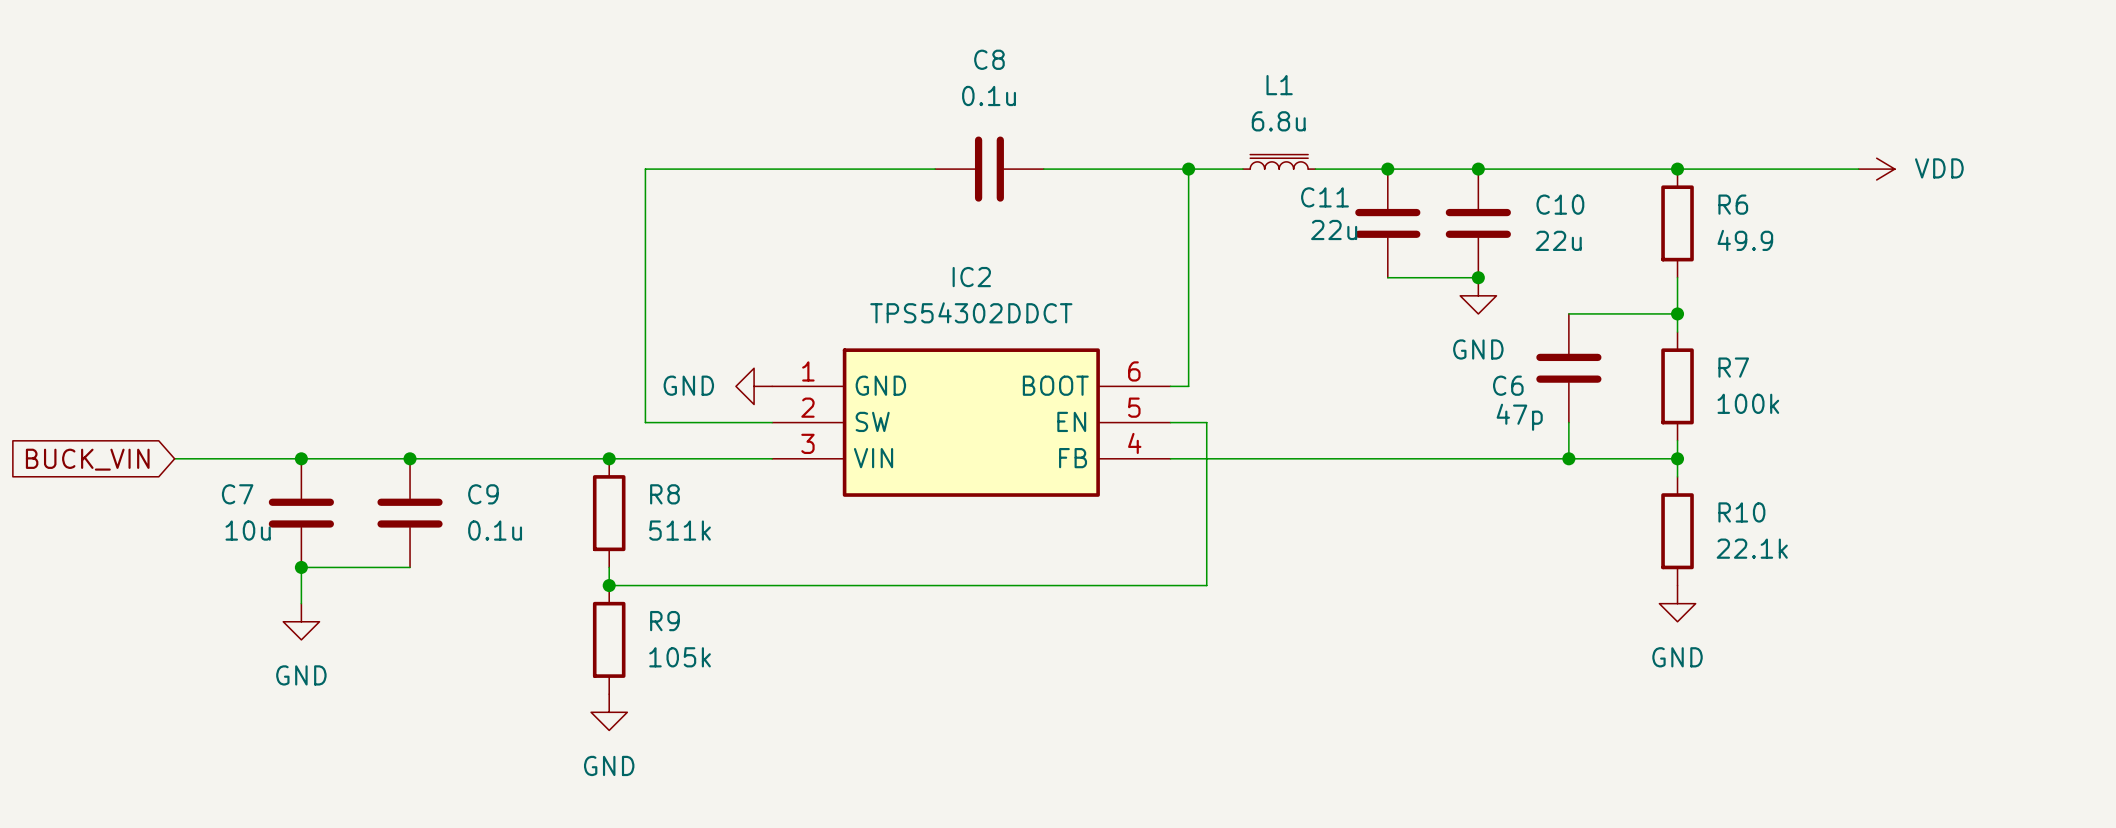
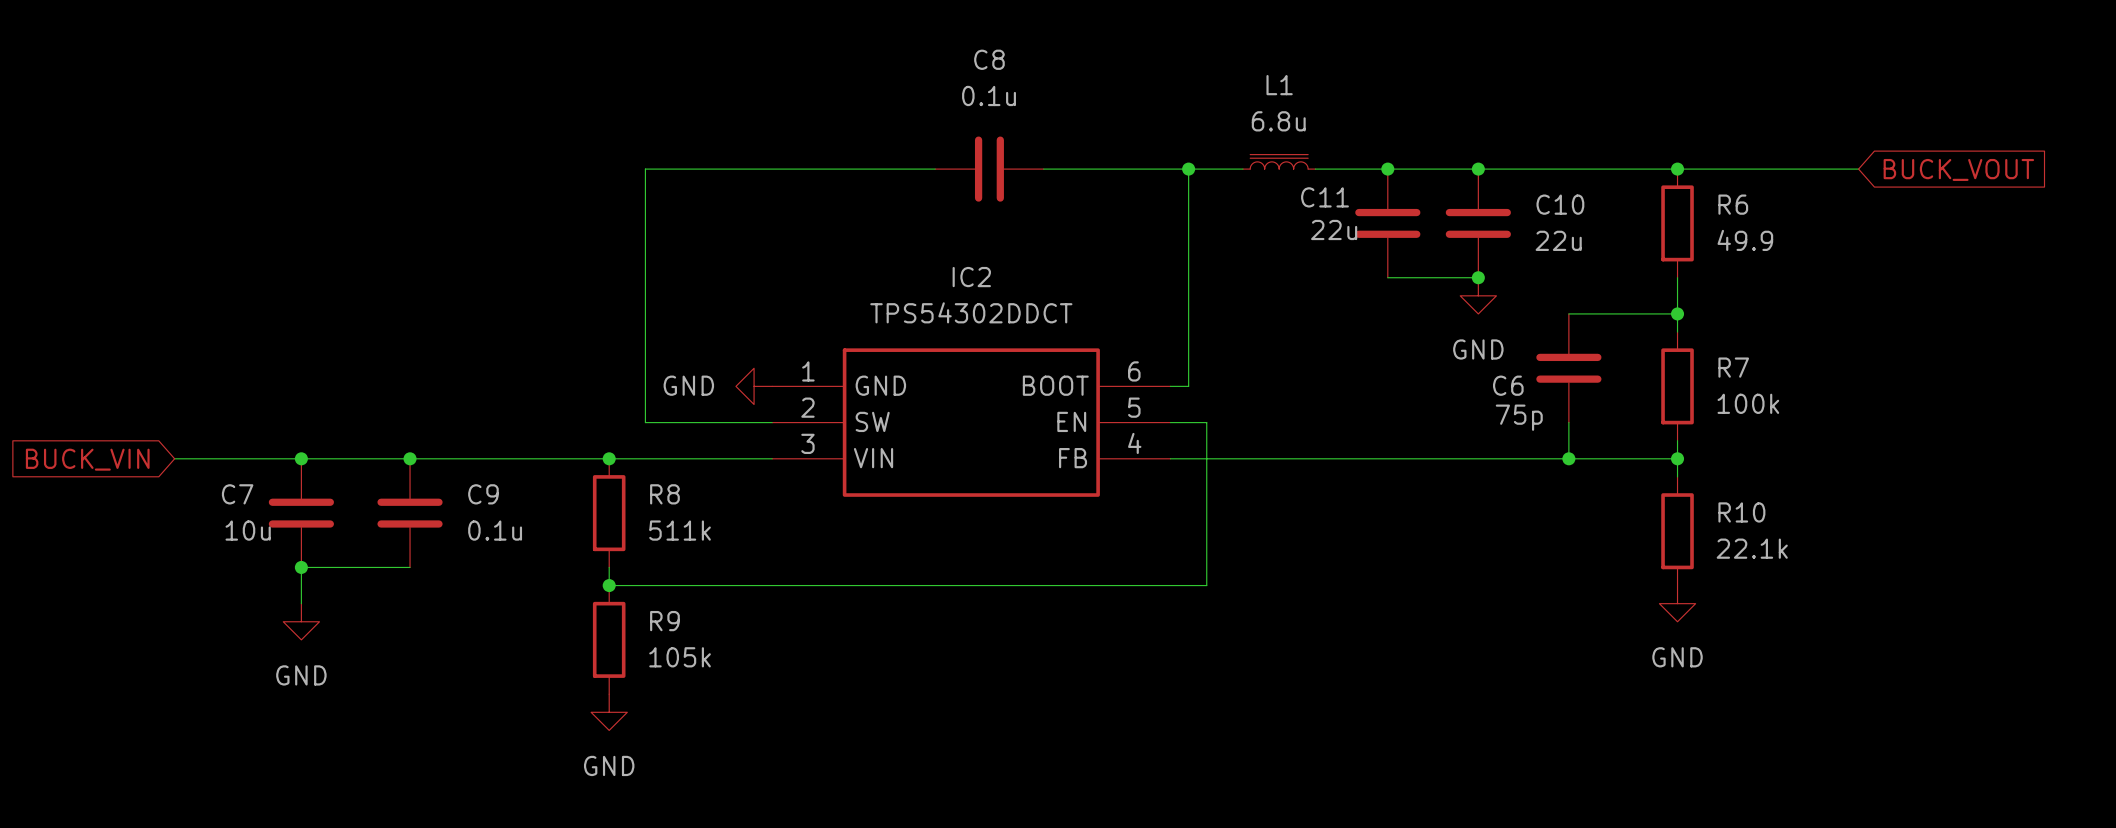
power symbol: VDD (1876, 169) -> none
global label: none -> BUCK_VOUT (1958, 169)
C6 value: 47p (1519, 417) -> 75p (1519, 417)

